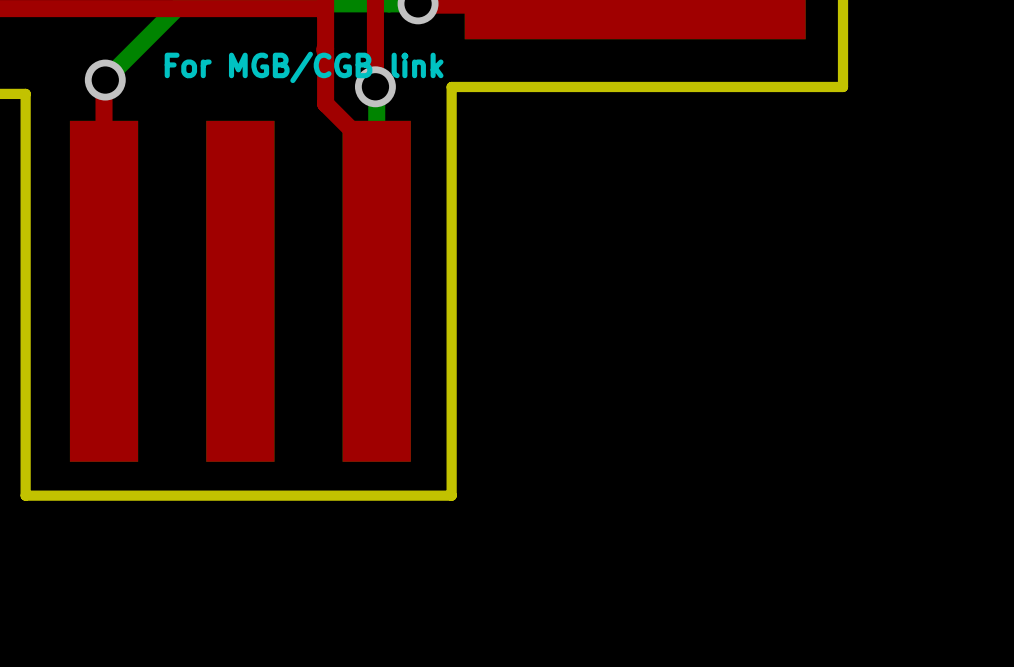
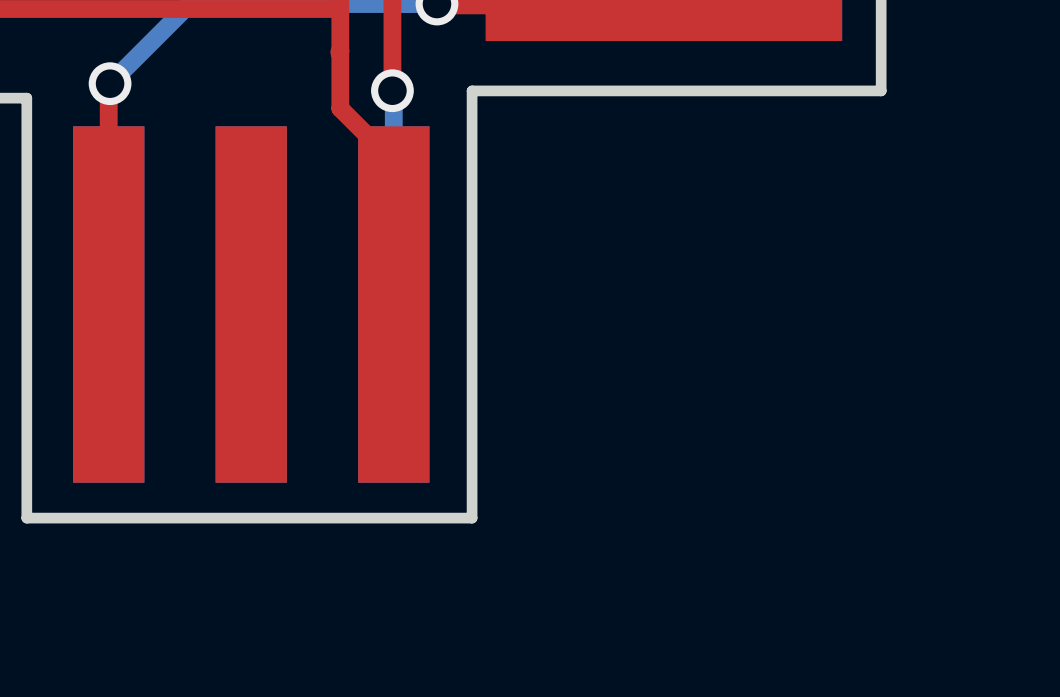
text: For MGB/CGB link (304, 67) -> none

